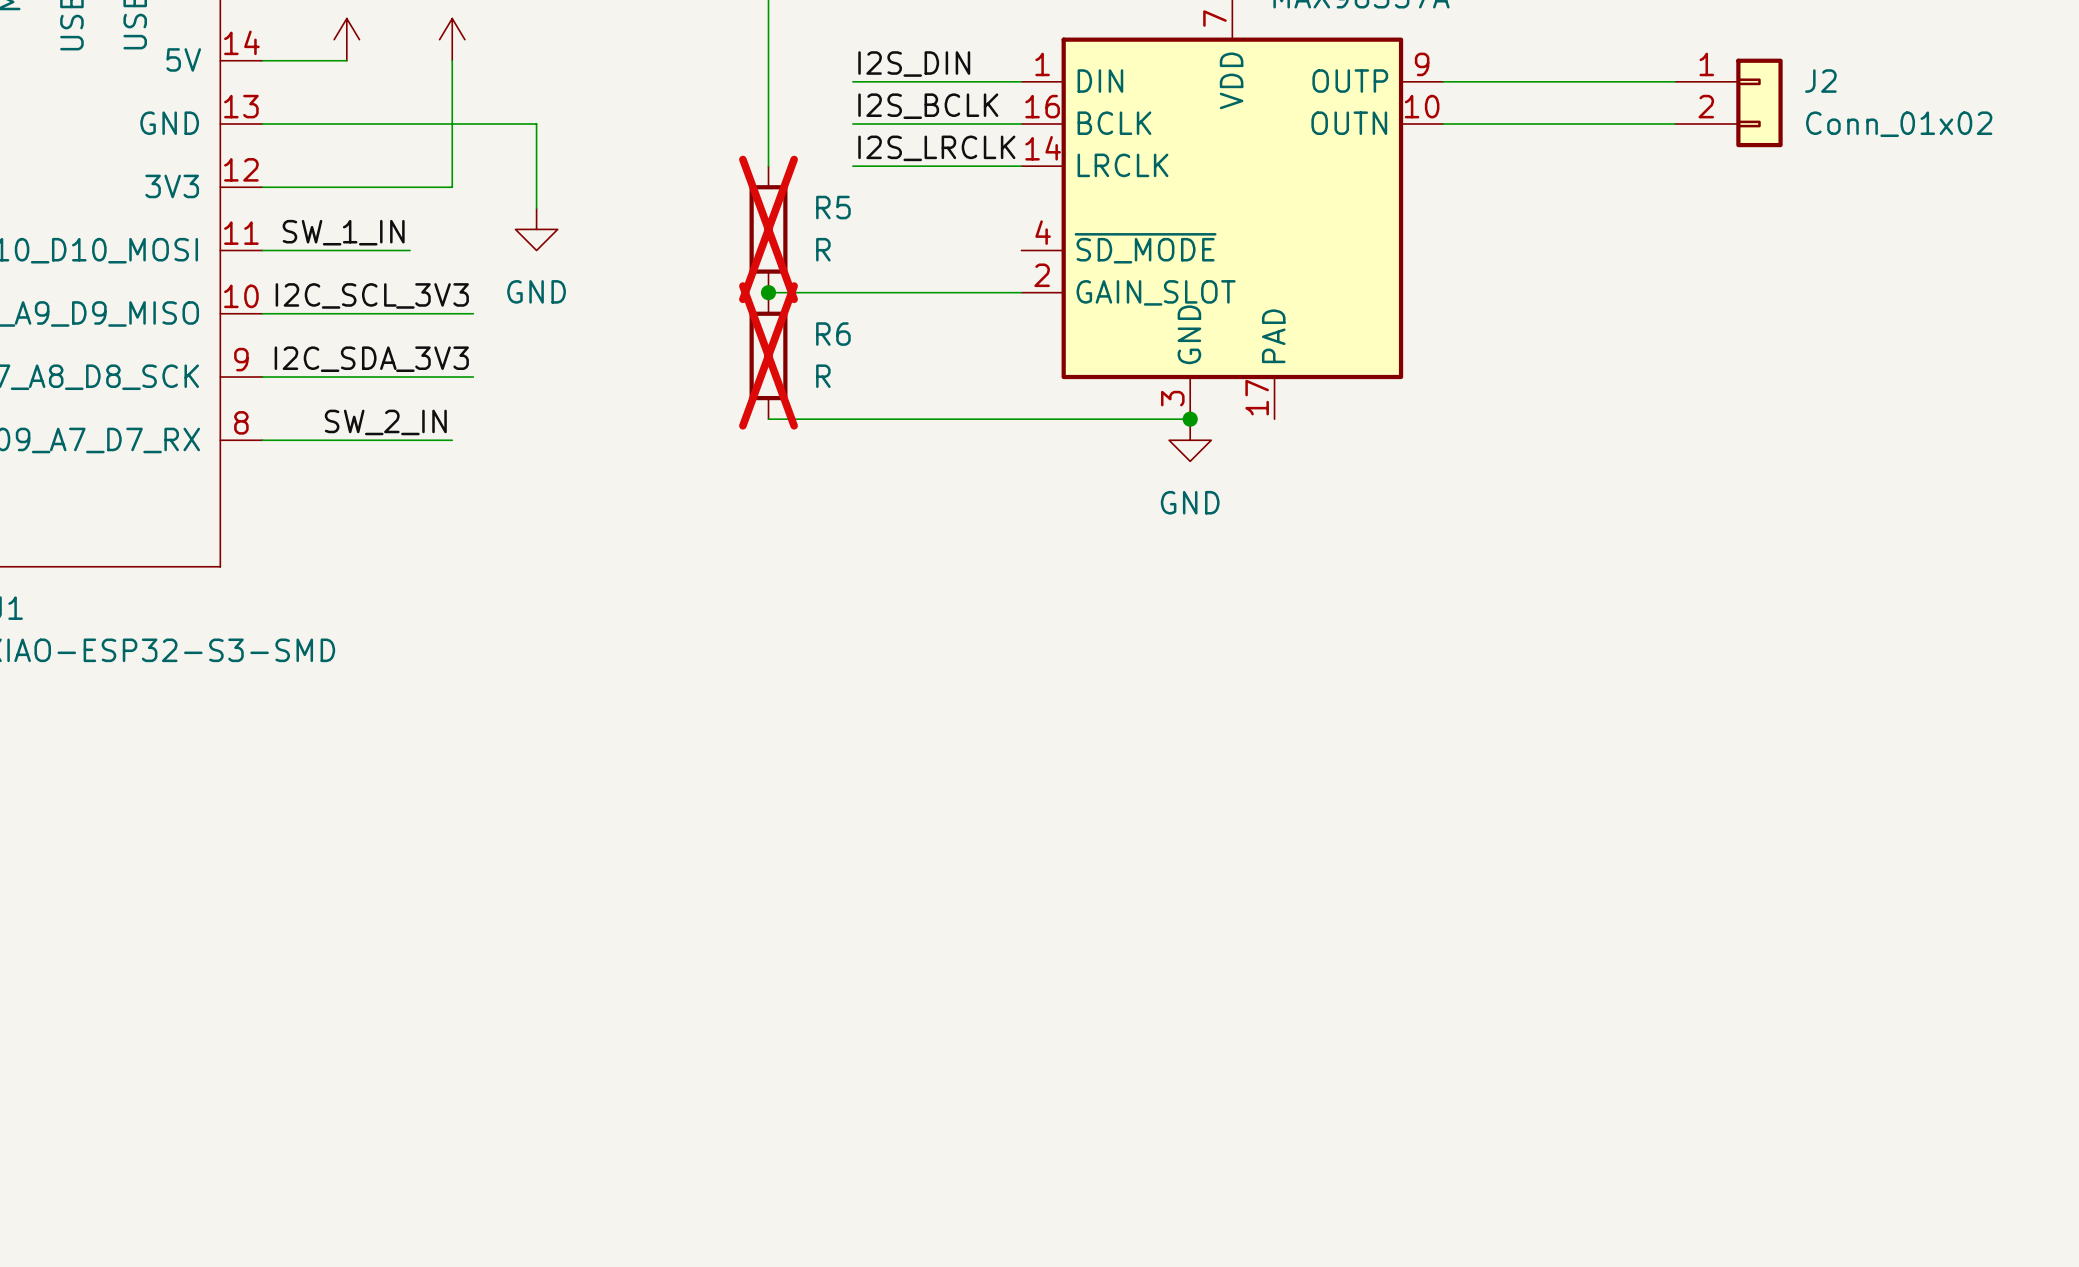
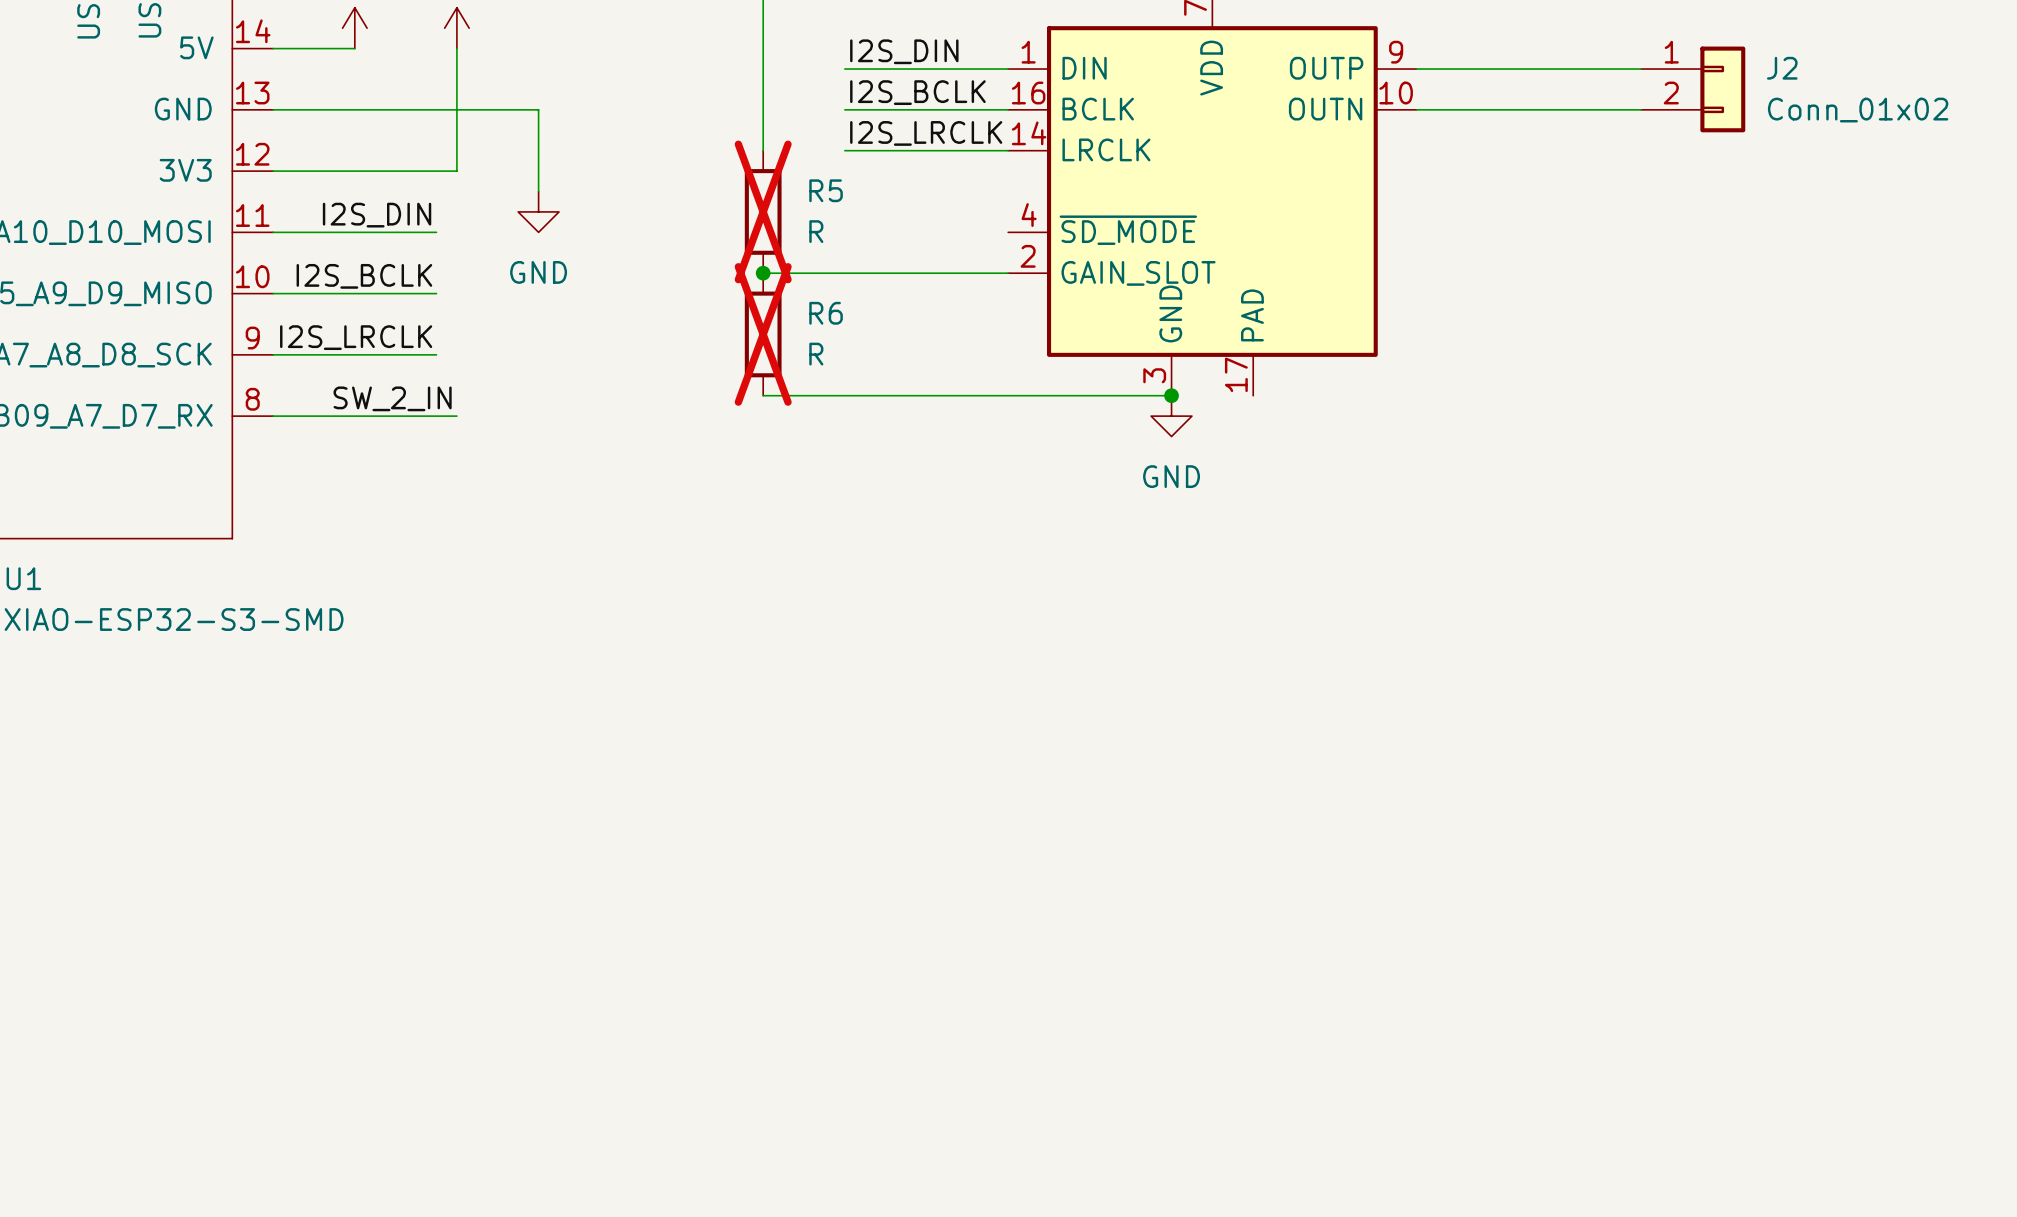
label: SW_1_IN (343, 232) -> none
label: none -> I2S_DIN (377, 215)
wire: none -> (416, 232) (436, 232)
label: none -> I2S_BCLK (364, 276)
label: I2C_SCL_3V3 (372, 295) -> none
wire: (431, 313) (473, 313) -> none
label: none -> I2S_LRCLK (356, 337)
label: I2C_SDA_3V3 (371, 359) -> none
wire: (431, 377) (473, 377) -> none

